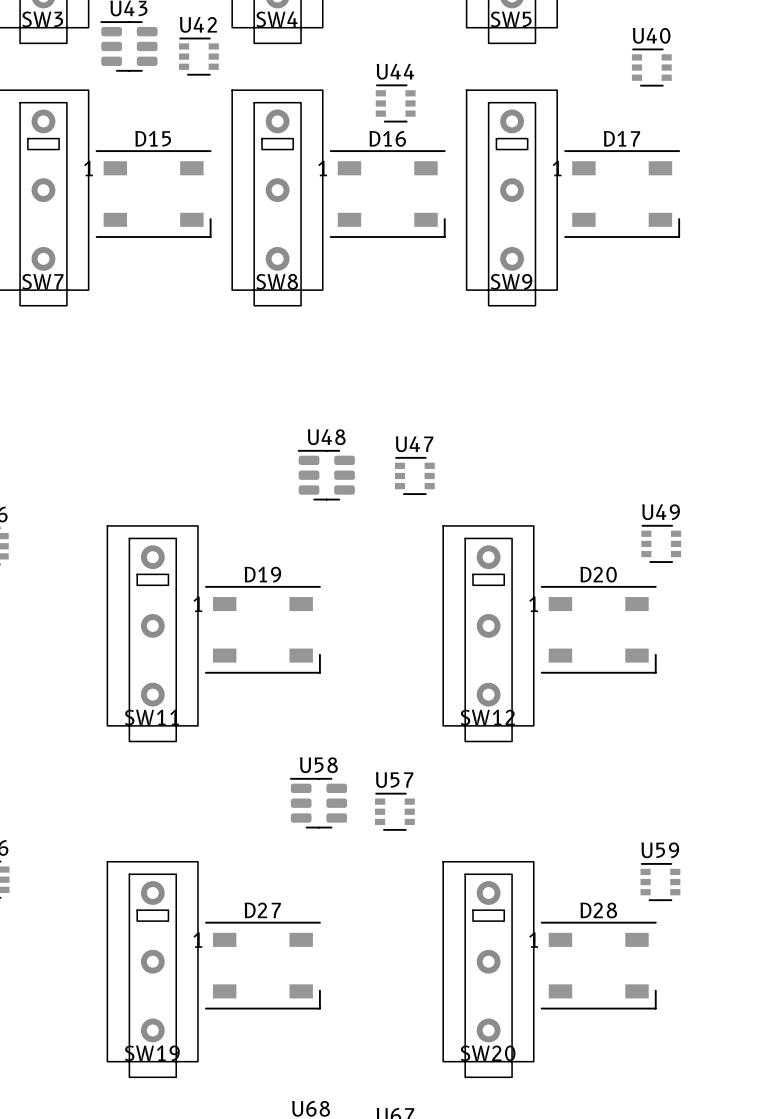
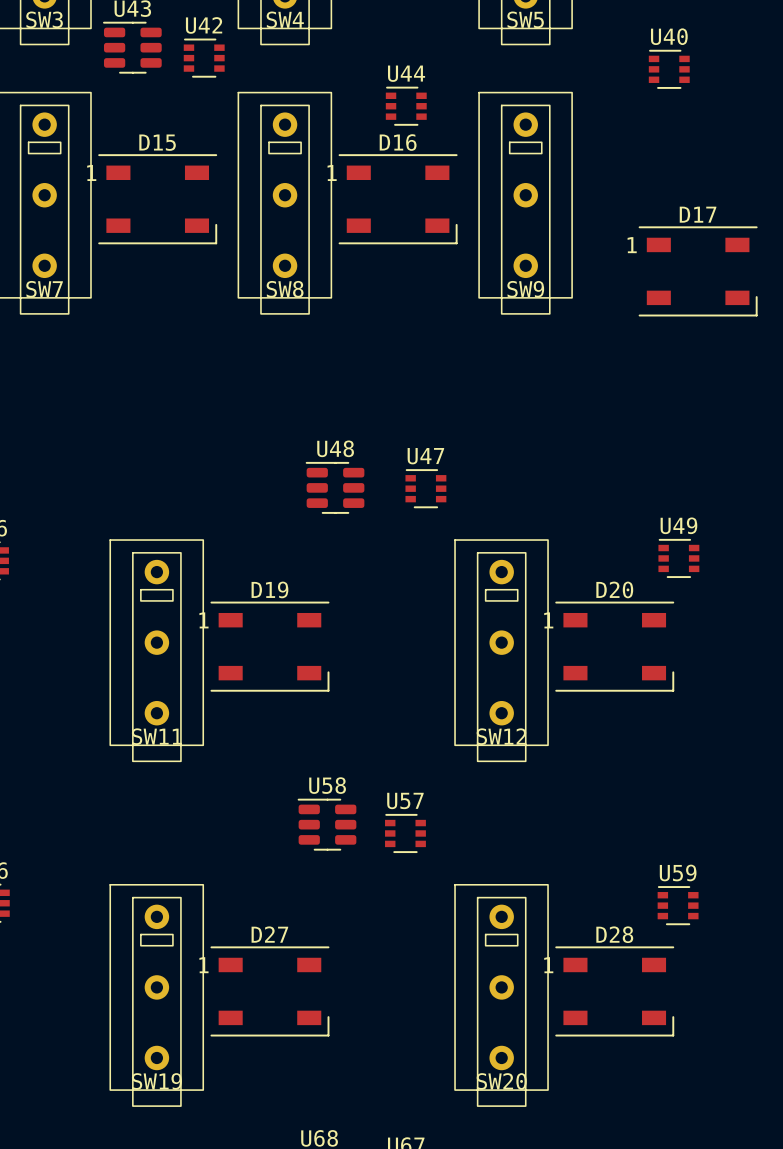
D17 position: (622, 194) -> (698, 271)

